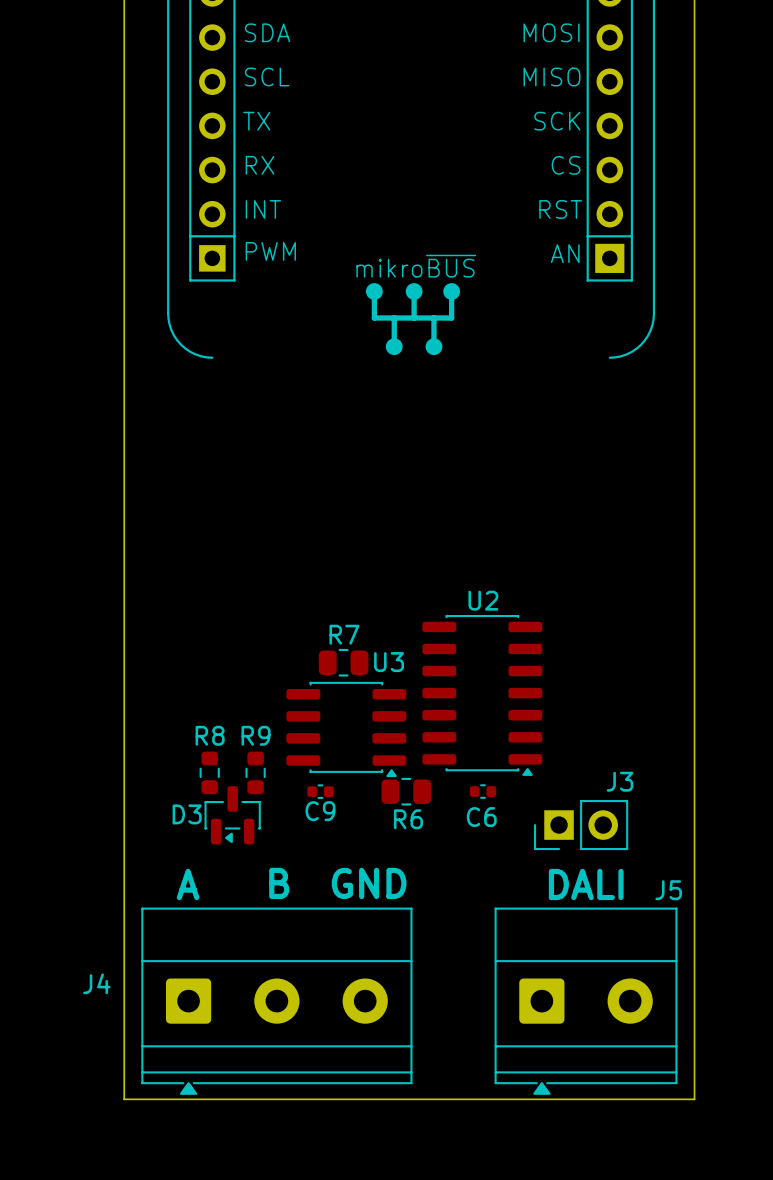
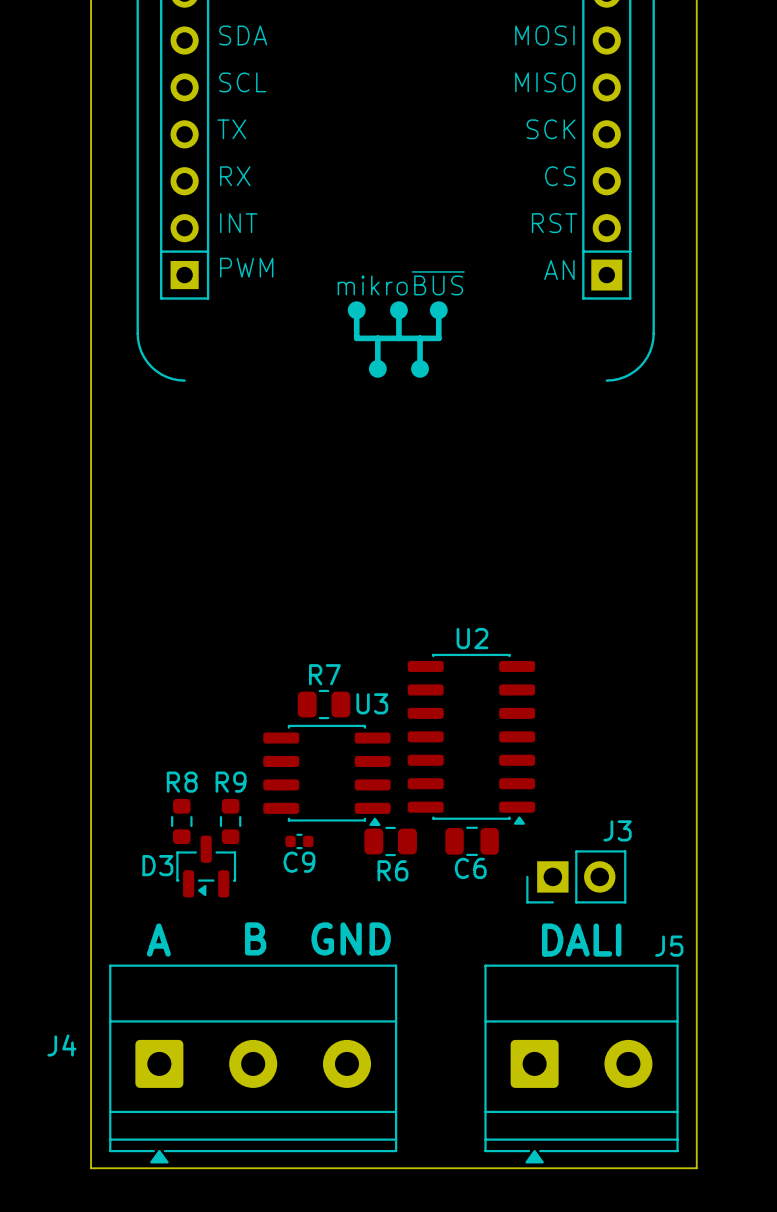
C6 footprint: [469, 784, 497, 799] -> [445, 826, 499, 857]

